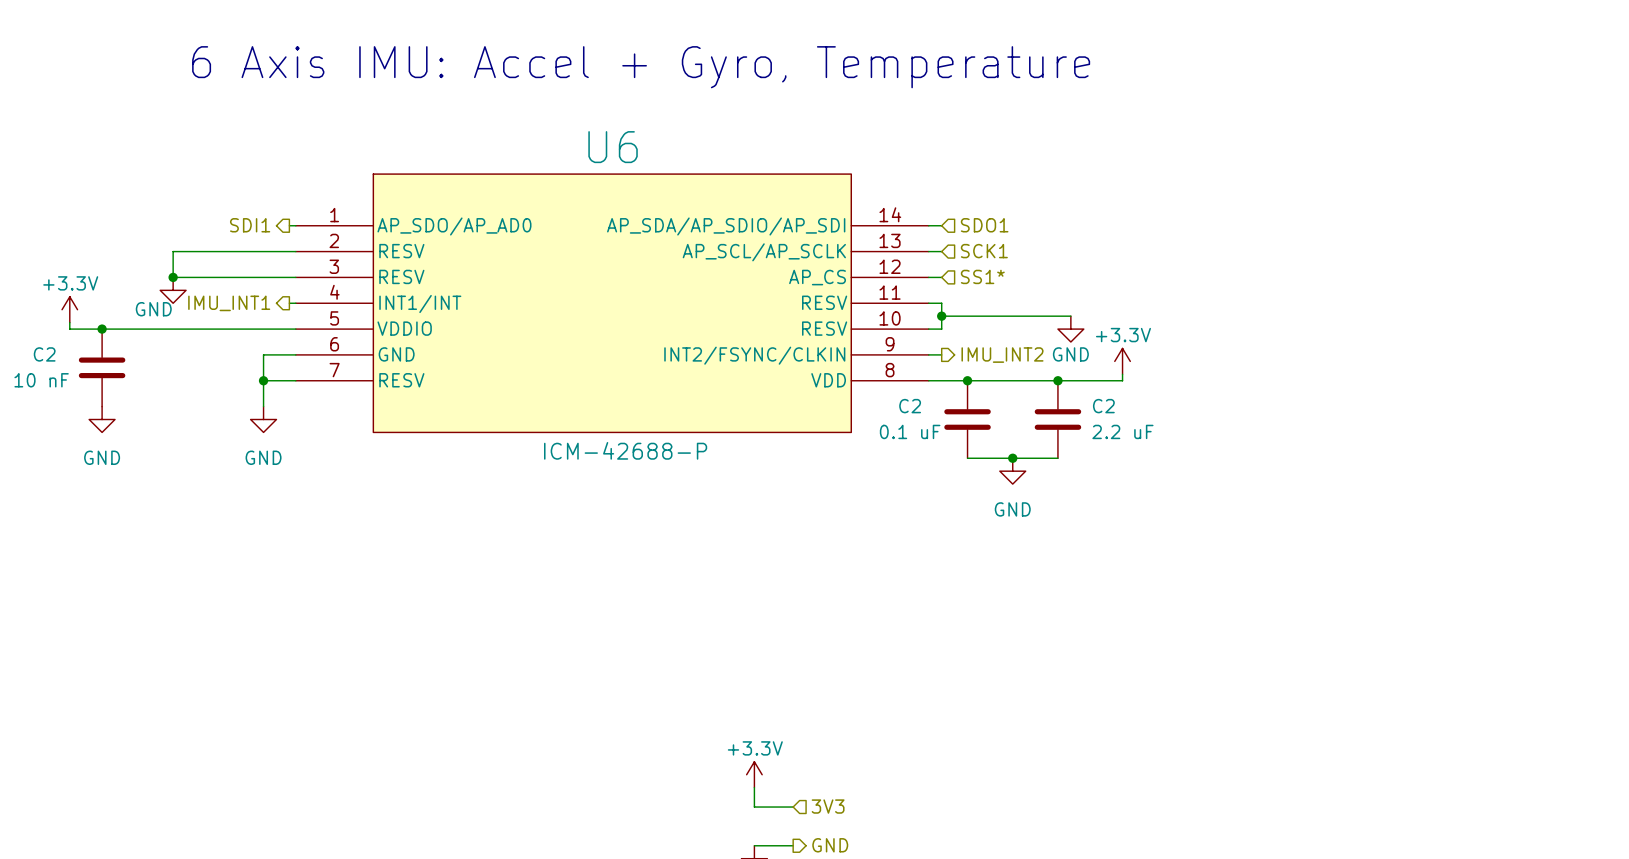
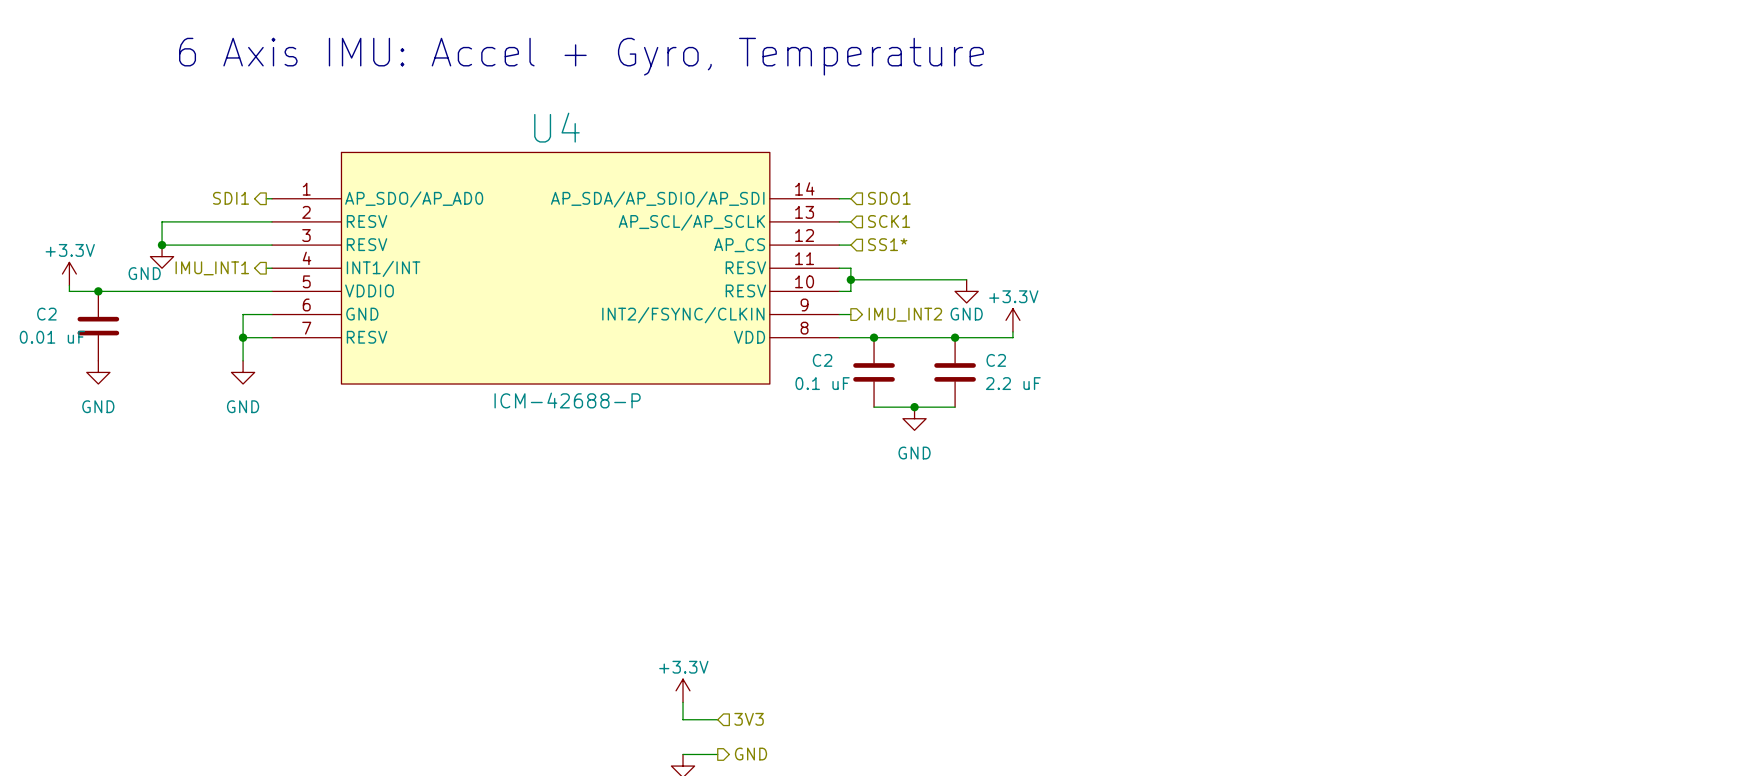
U6 name: U6 (613, 147) -> U4 (556, 127)
C2 value: 10 nF (41, 380) -> 0.01 uF (52, 337)

